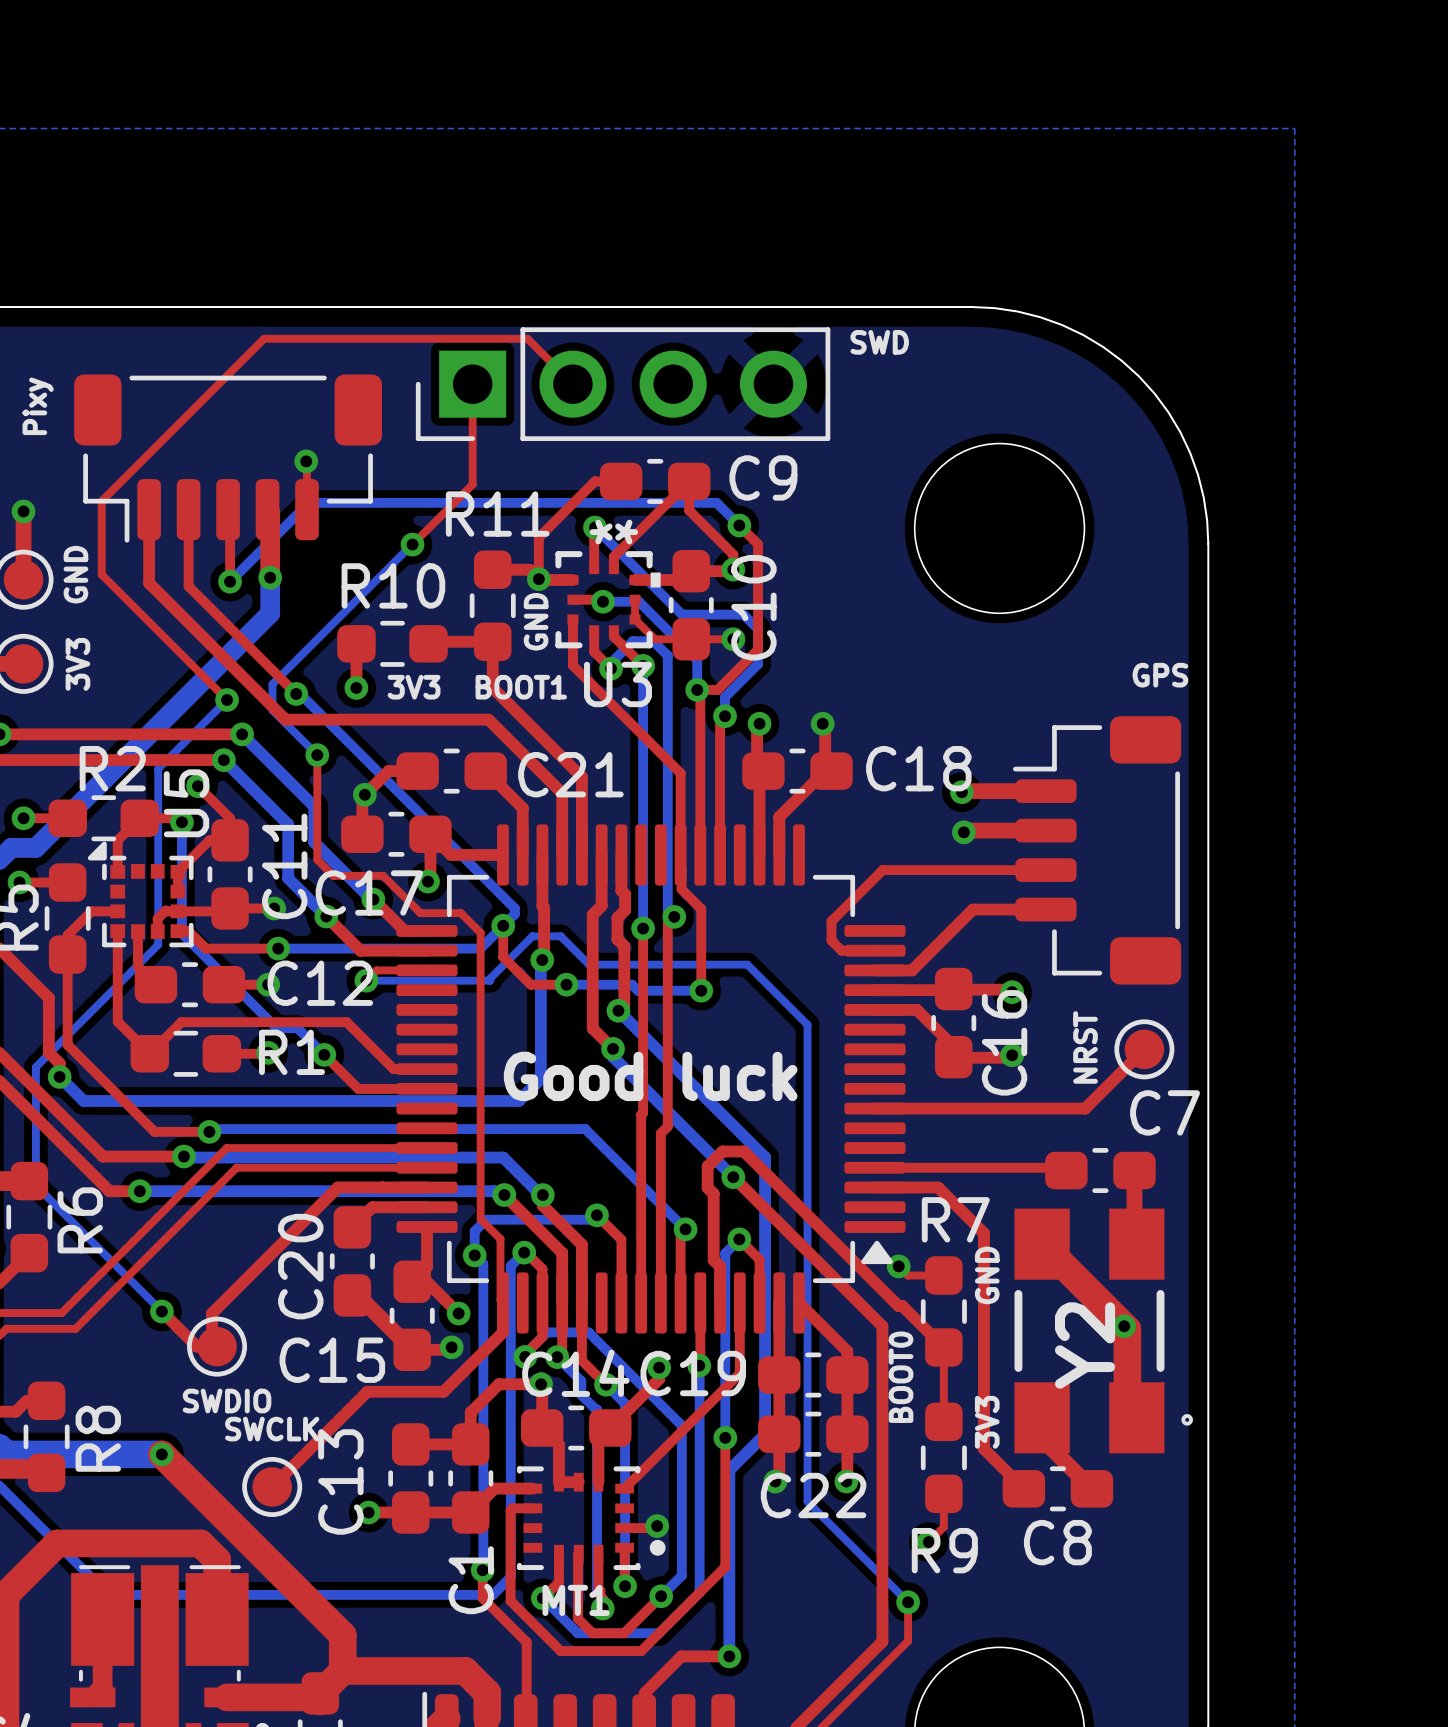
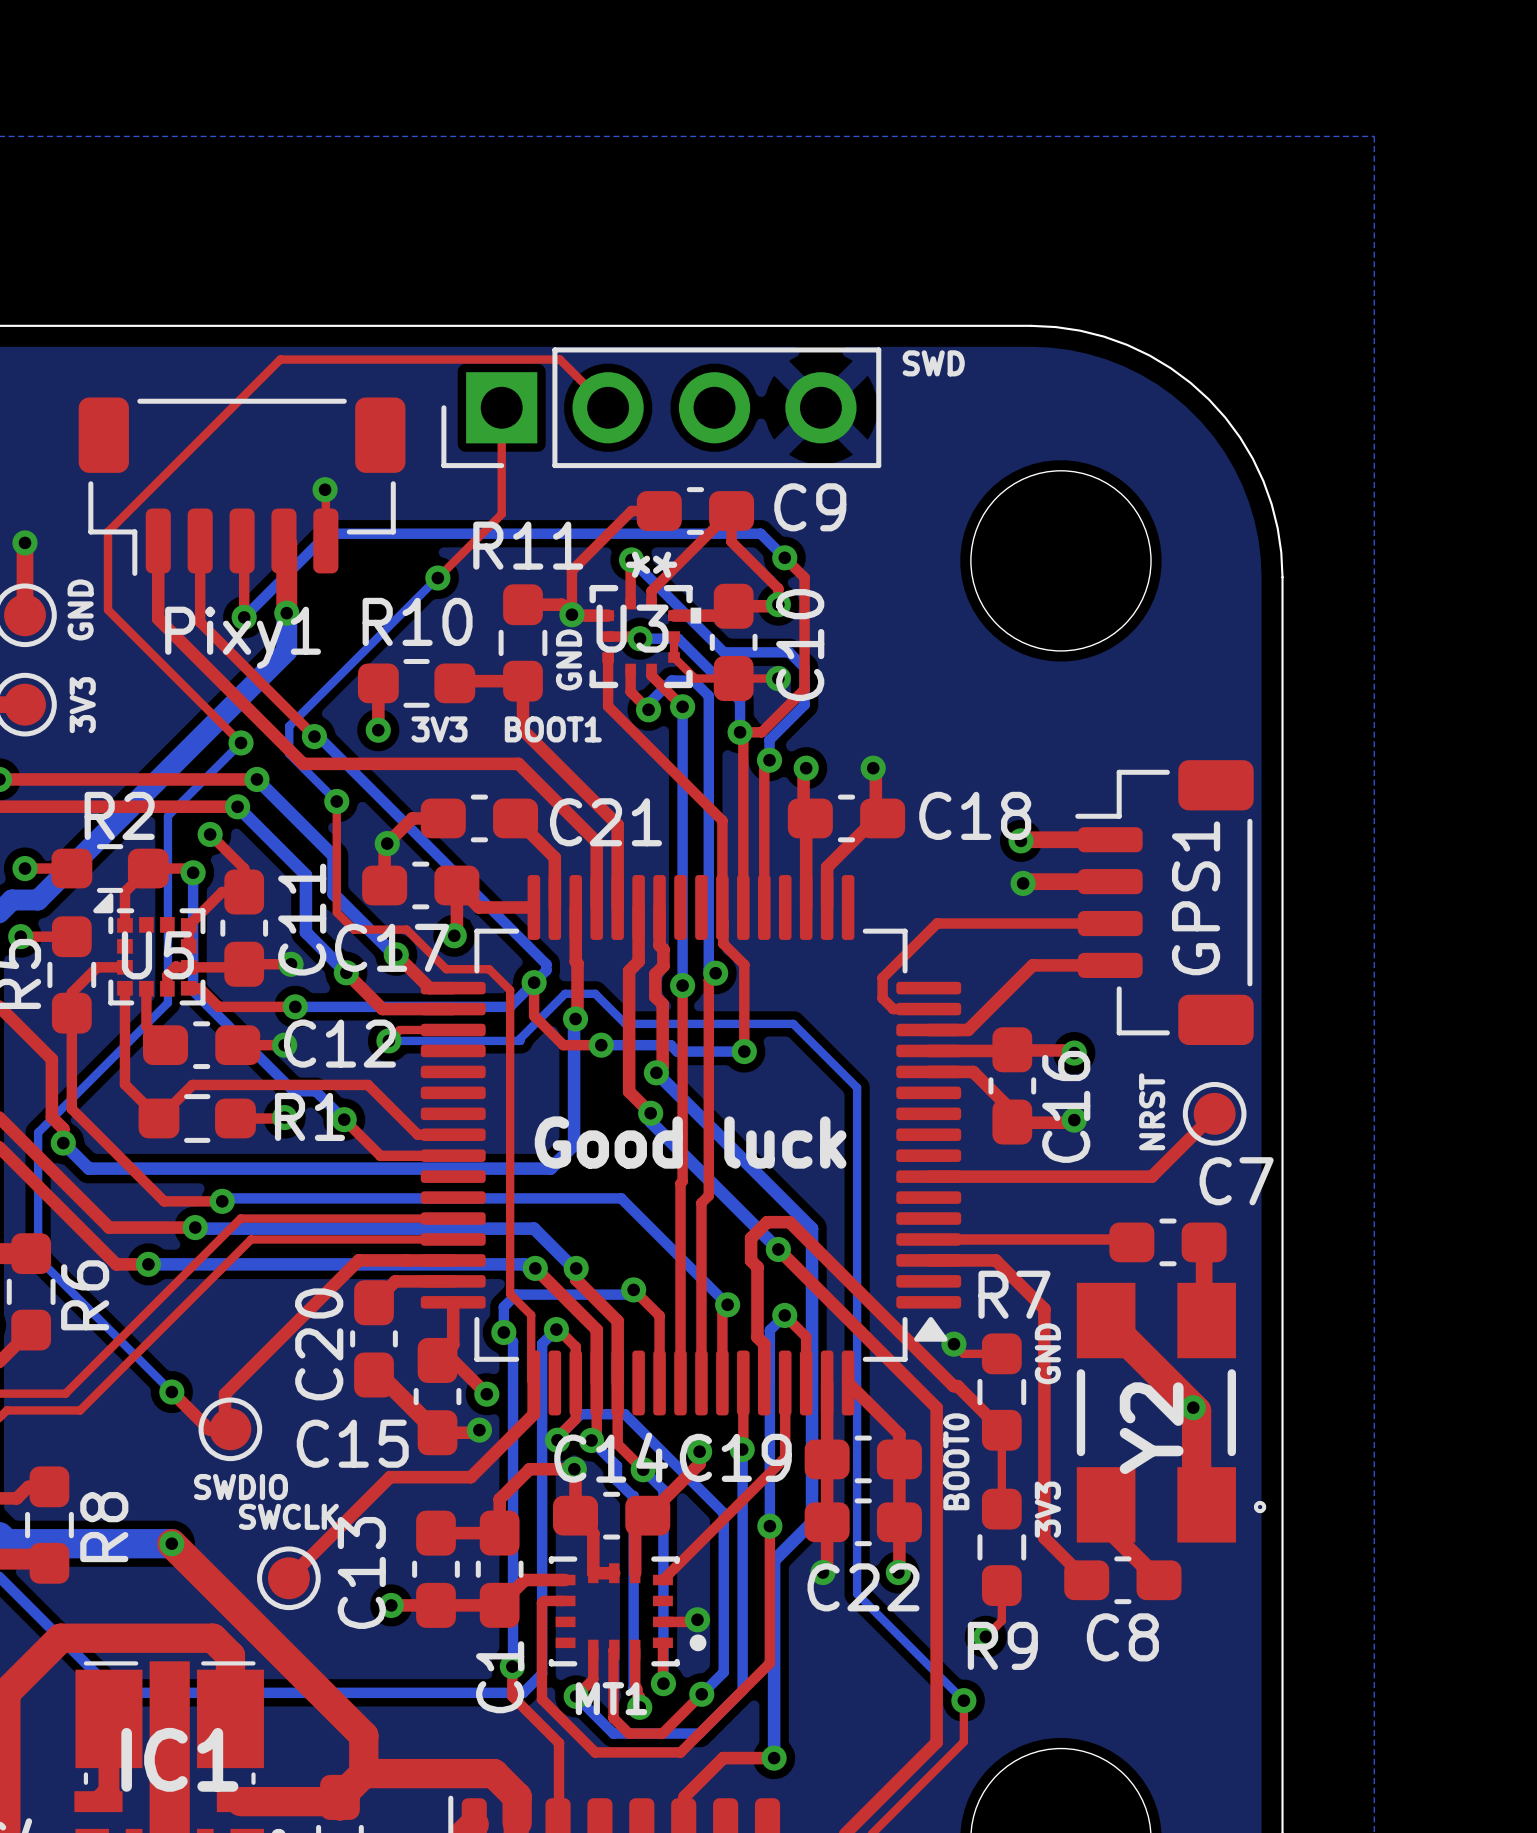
Pixy name: Pixy (38, 406) -> Pixy1 (243, 637)
GPS name: GPS (1160, 675) -> GPS1 (1196, 898)
U3 name position: U3 (617, 684) -> U3 (632, 628)
U5 name rotation: 0° (186, 803) -> 90° clockwise (157, 955)
U5 name position: U5 (186, 803) -> U5 (157, 955)
IC1 name: none -> IC1 (179, 1759)

